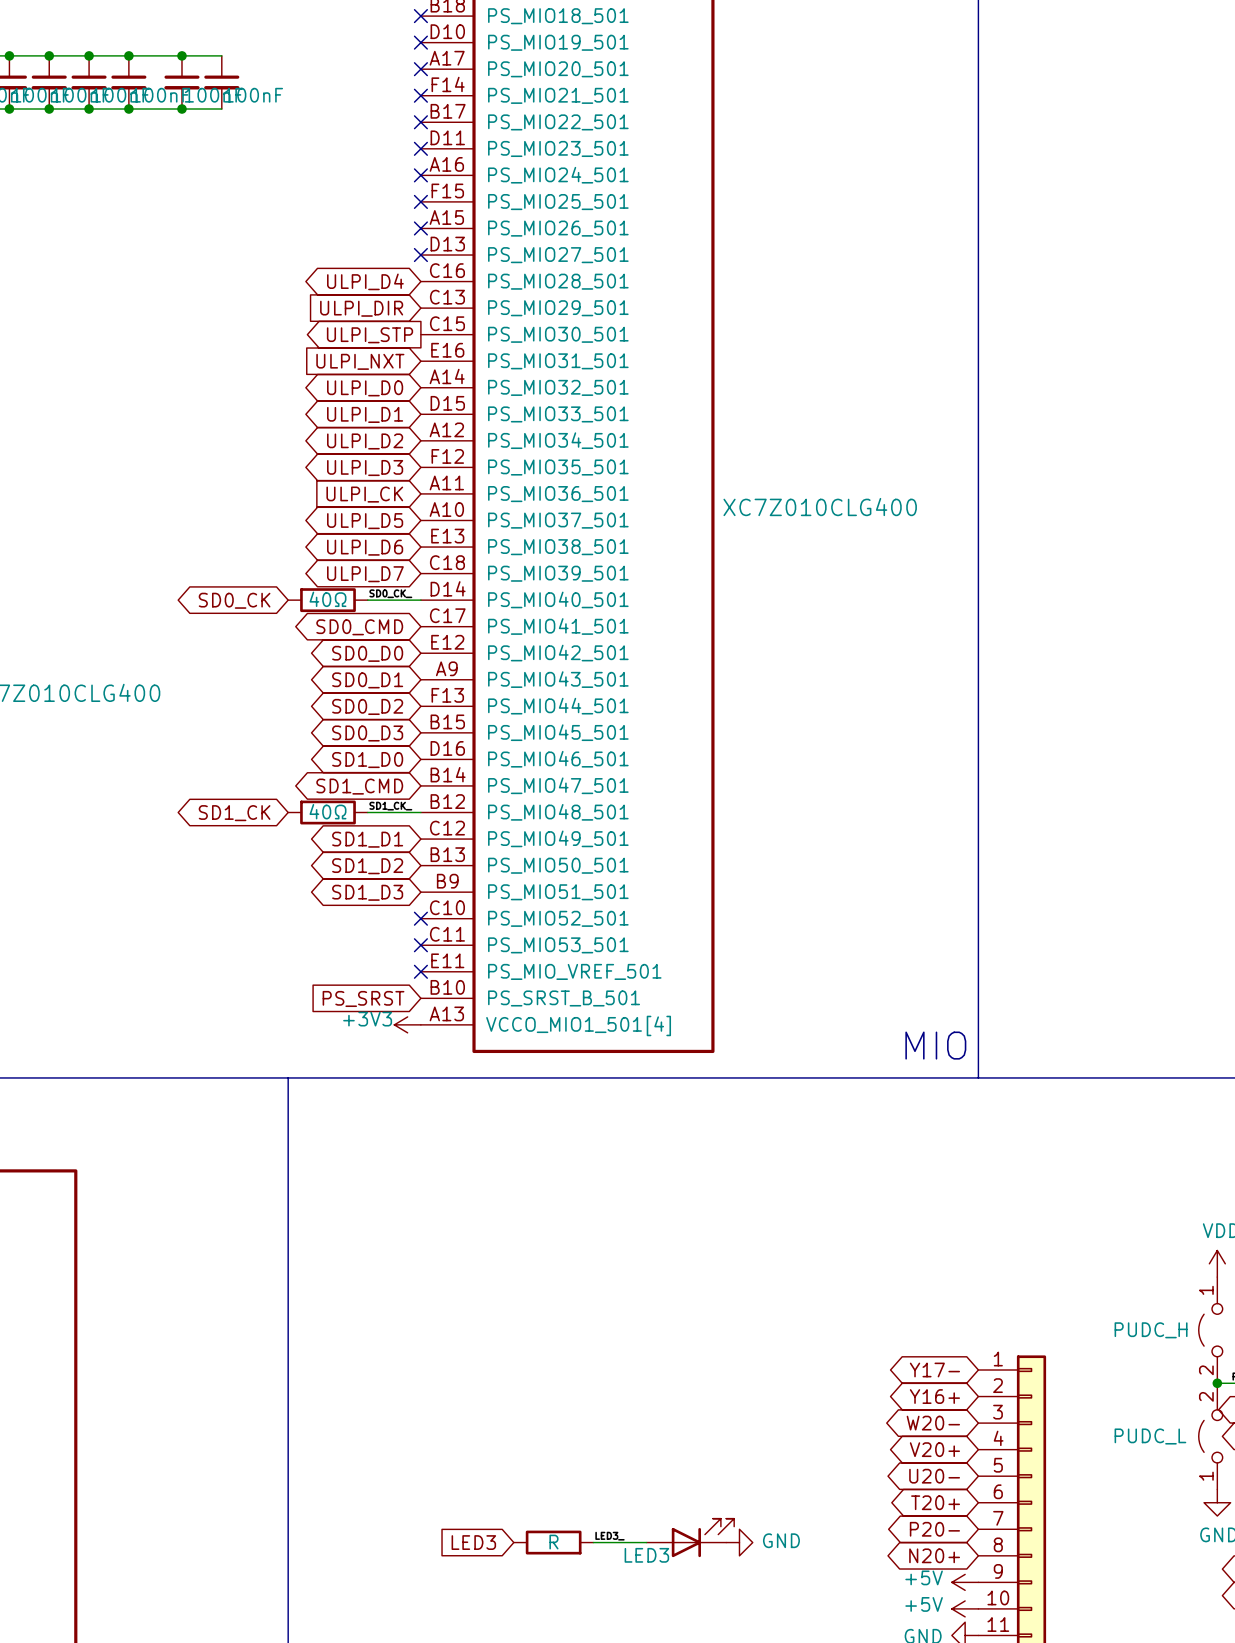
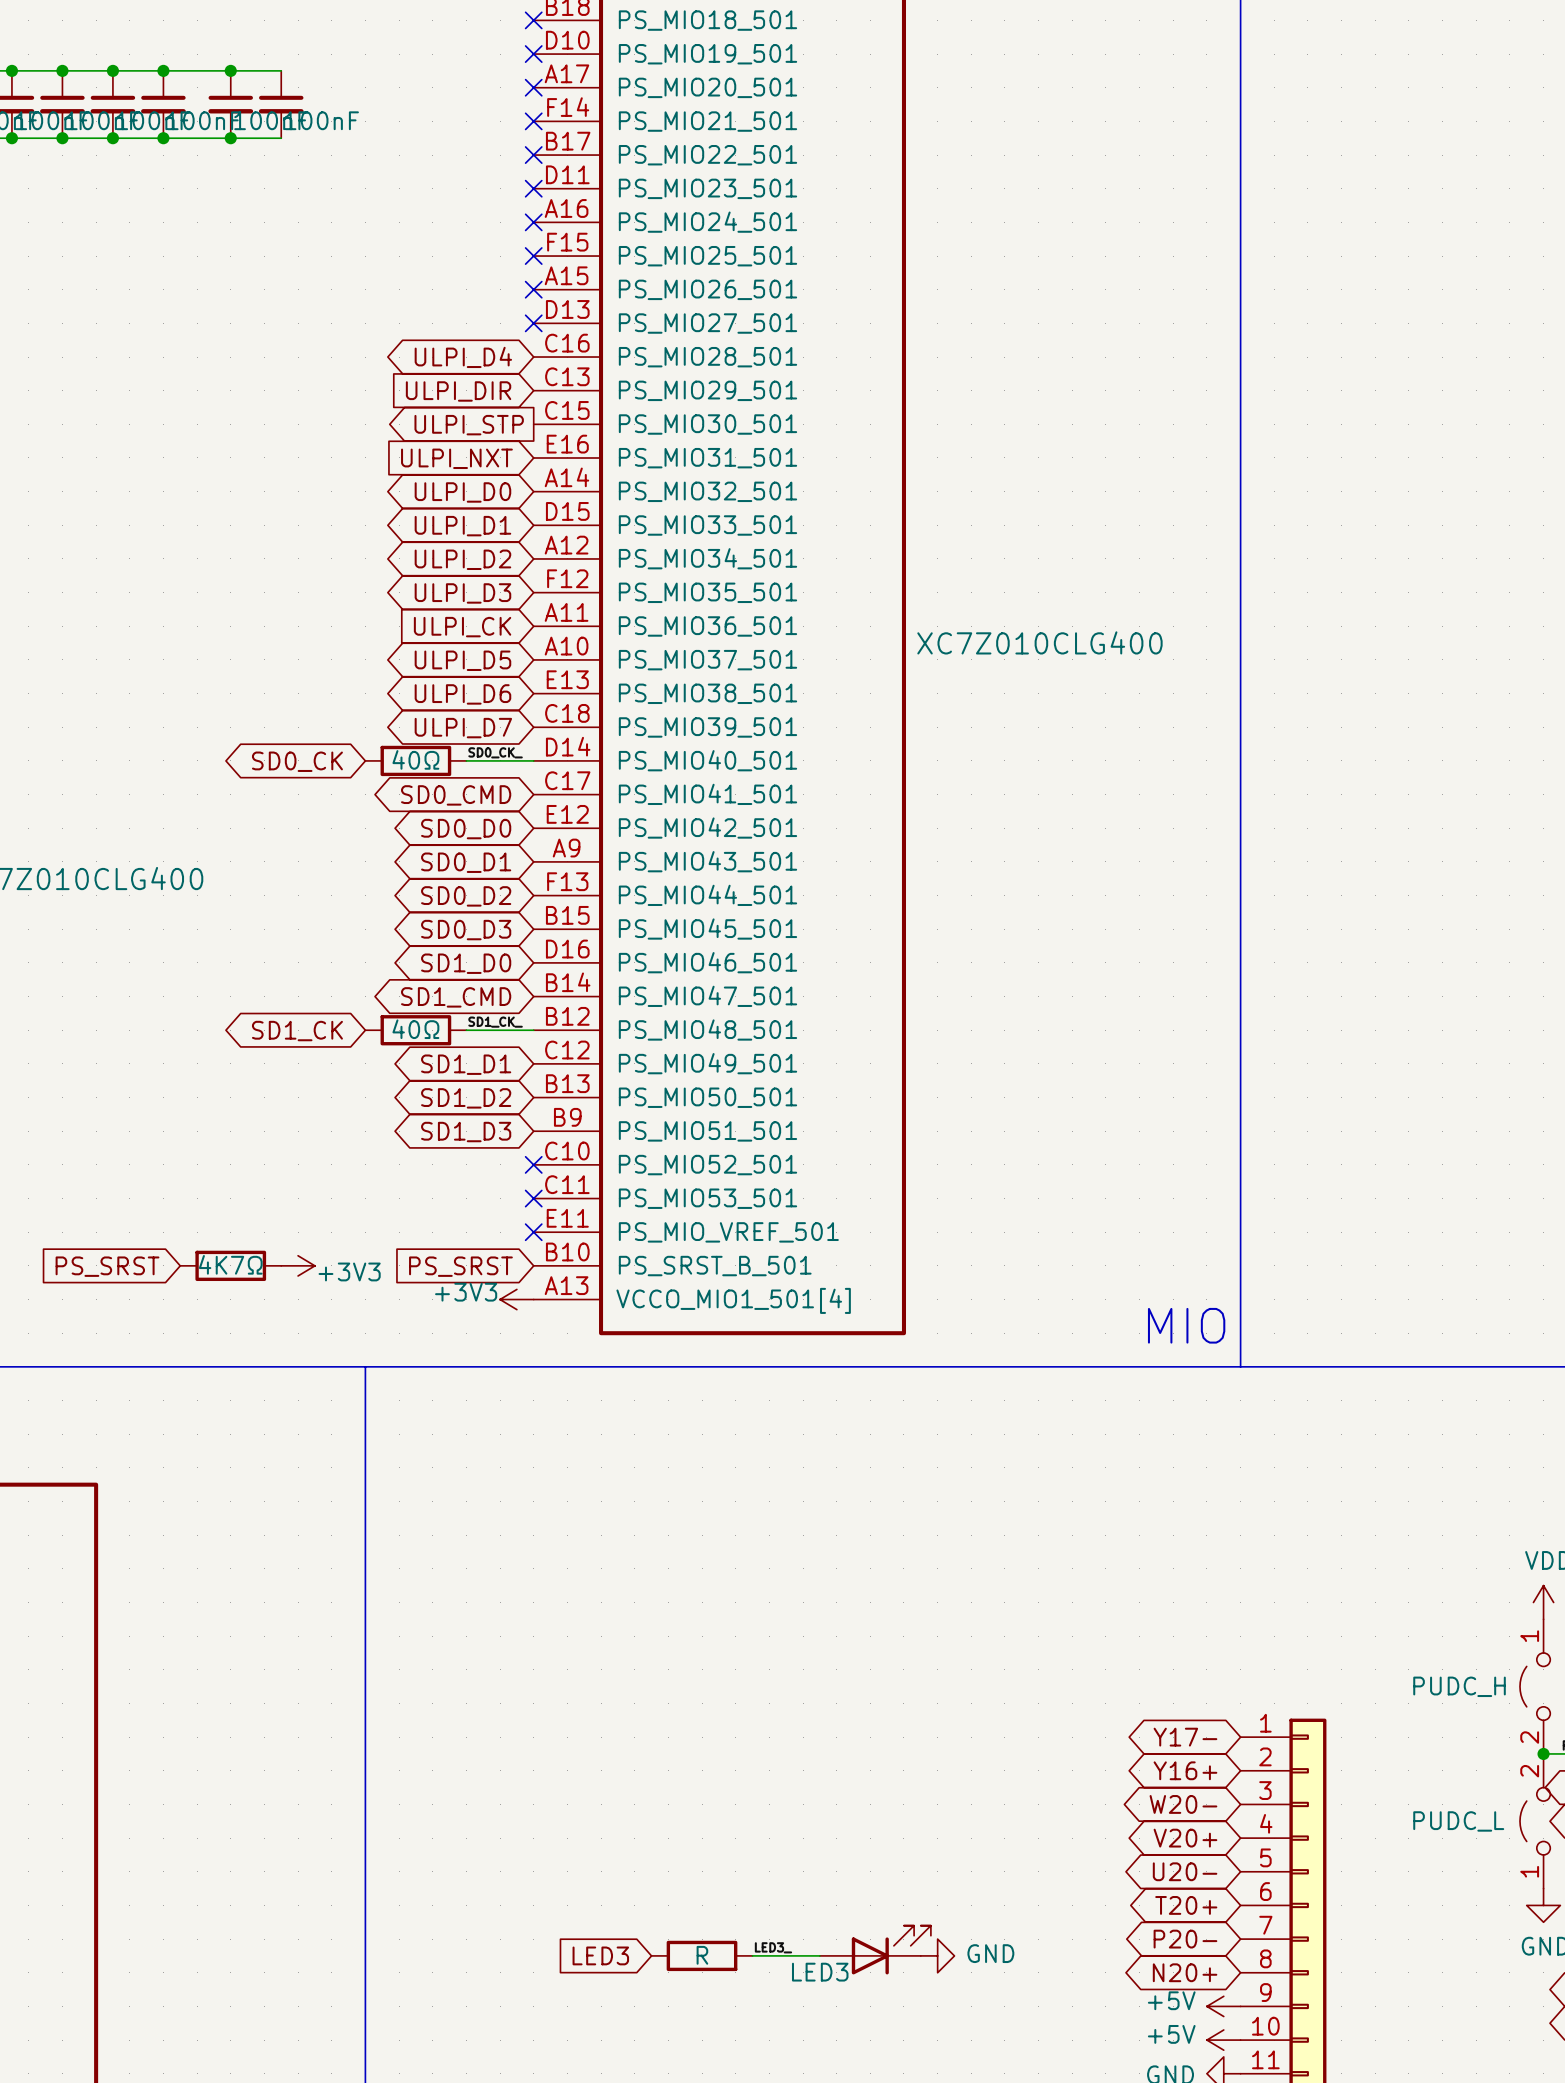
global label: none -> PS_SRST (107, 1266)
part: none -> 4K7Ω (230, 1265)
power symbol: none -> +3V3 (298, 1265)

